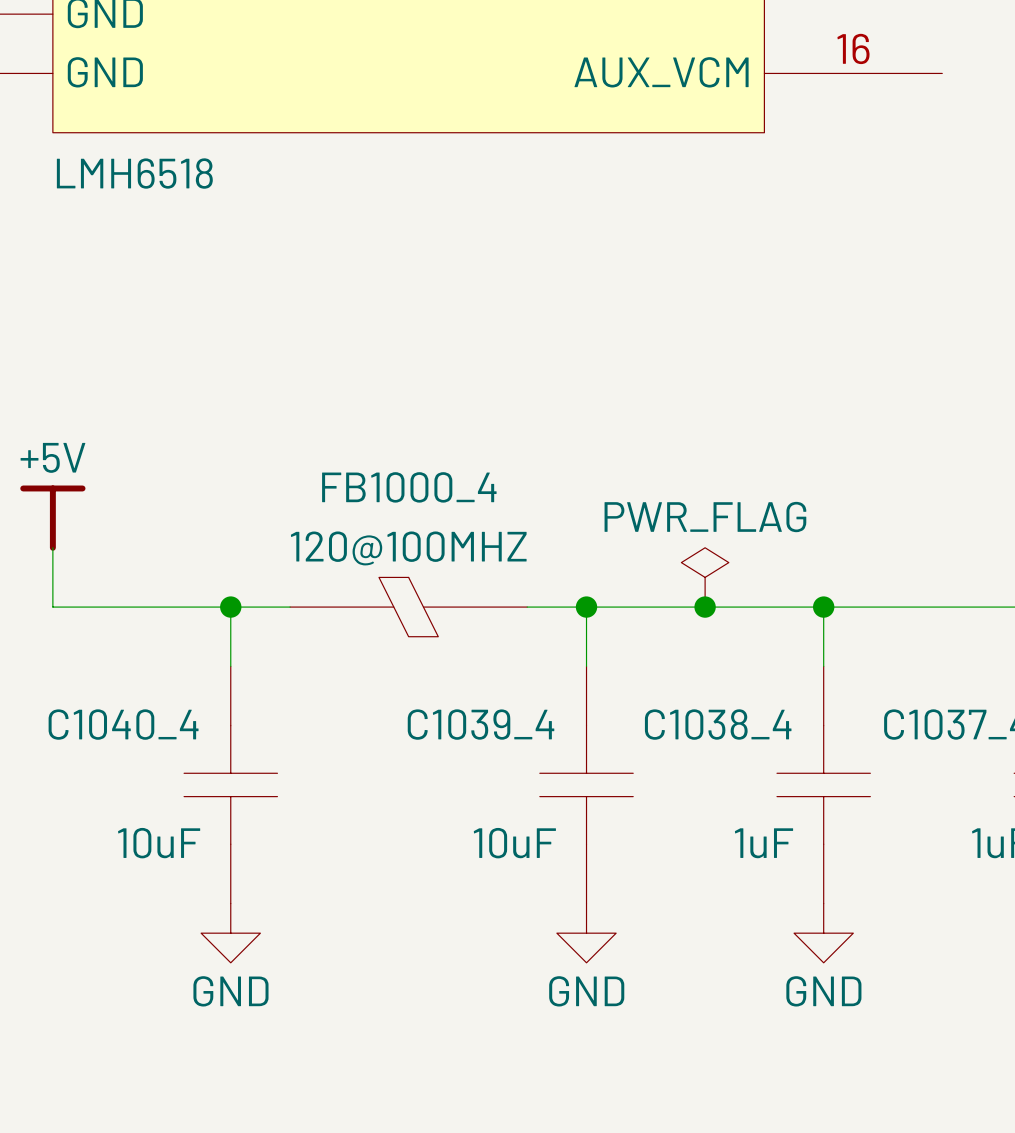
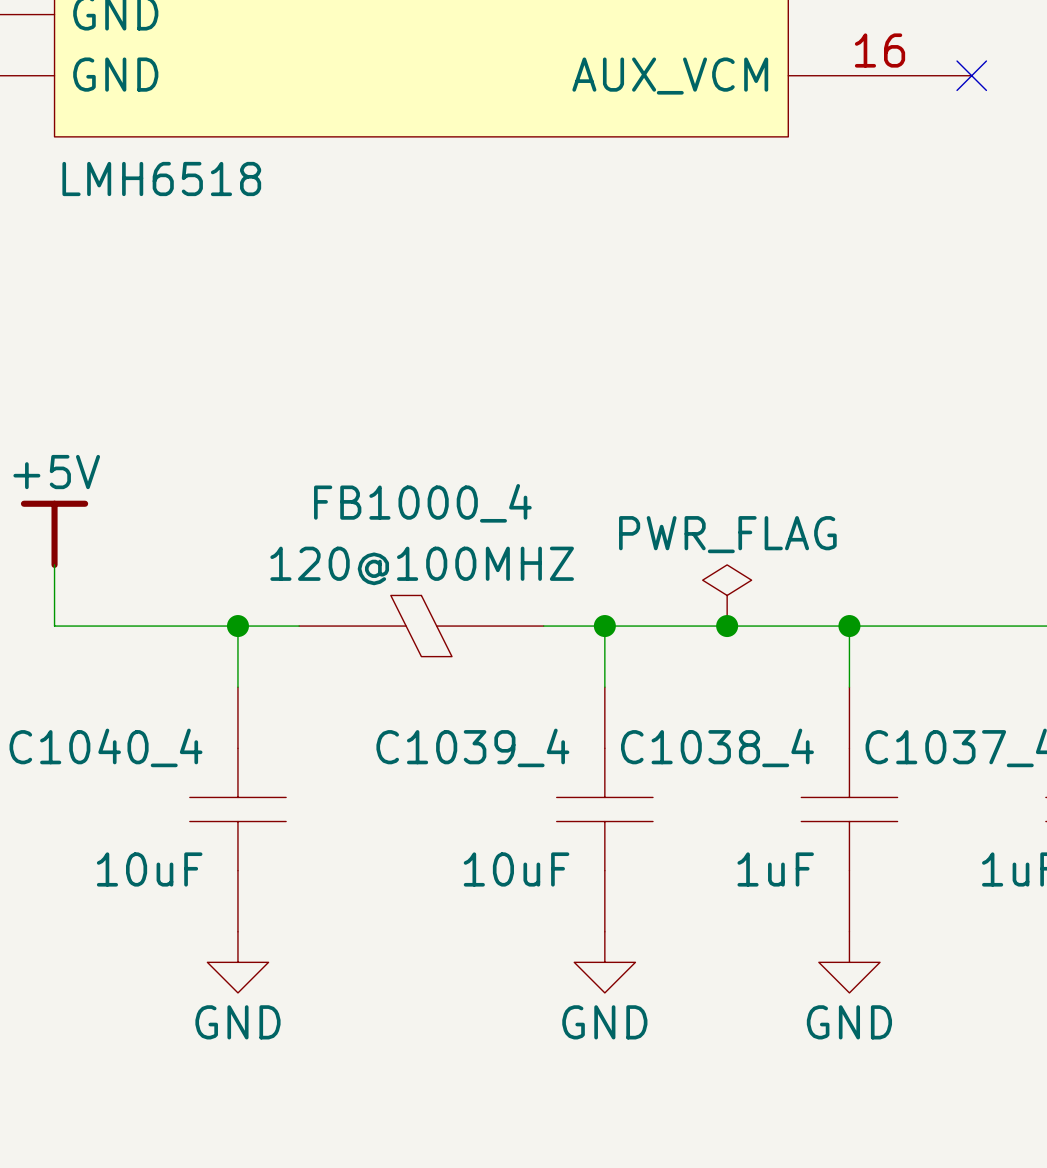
no-connect mark: none -> (971, 75)

